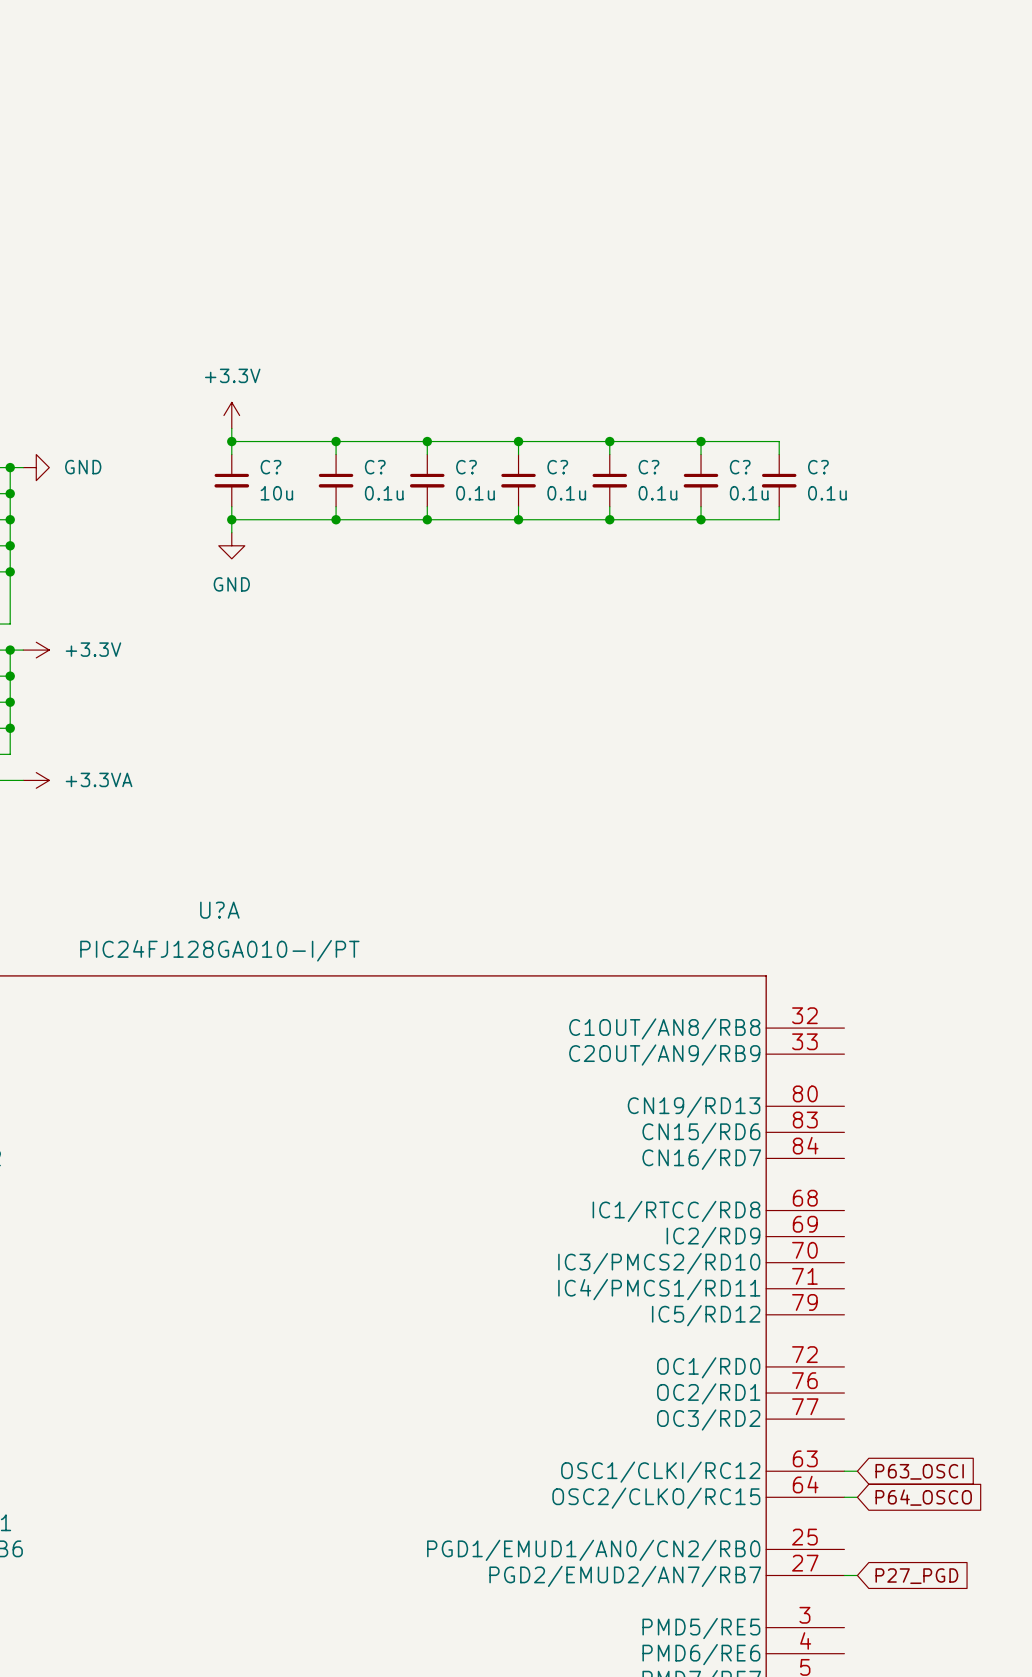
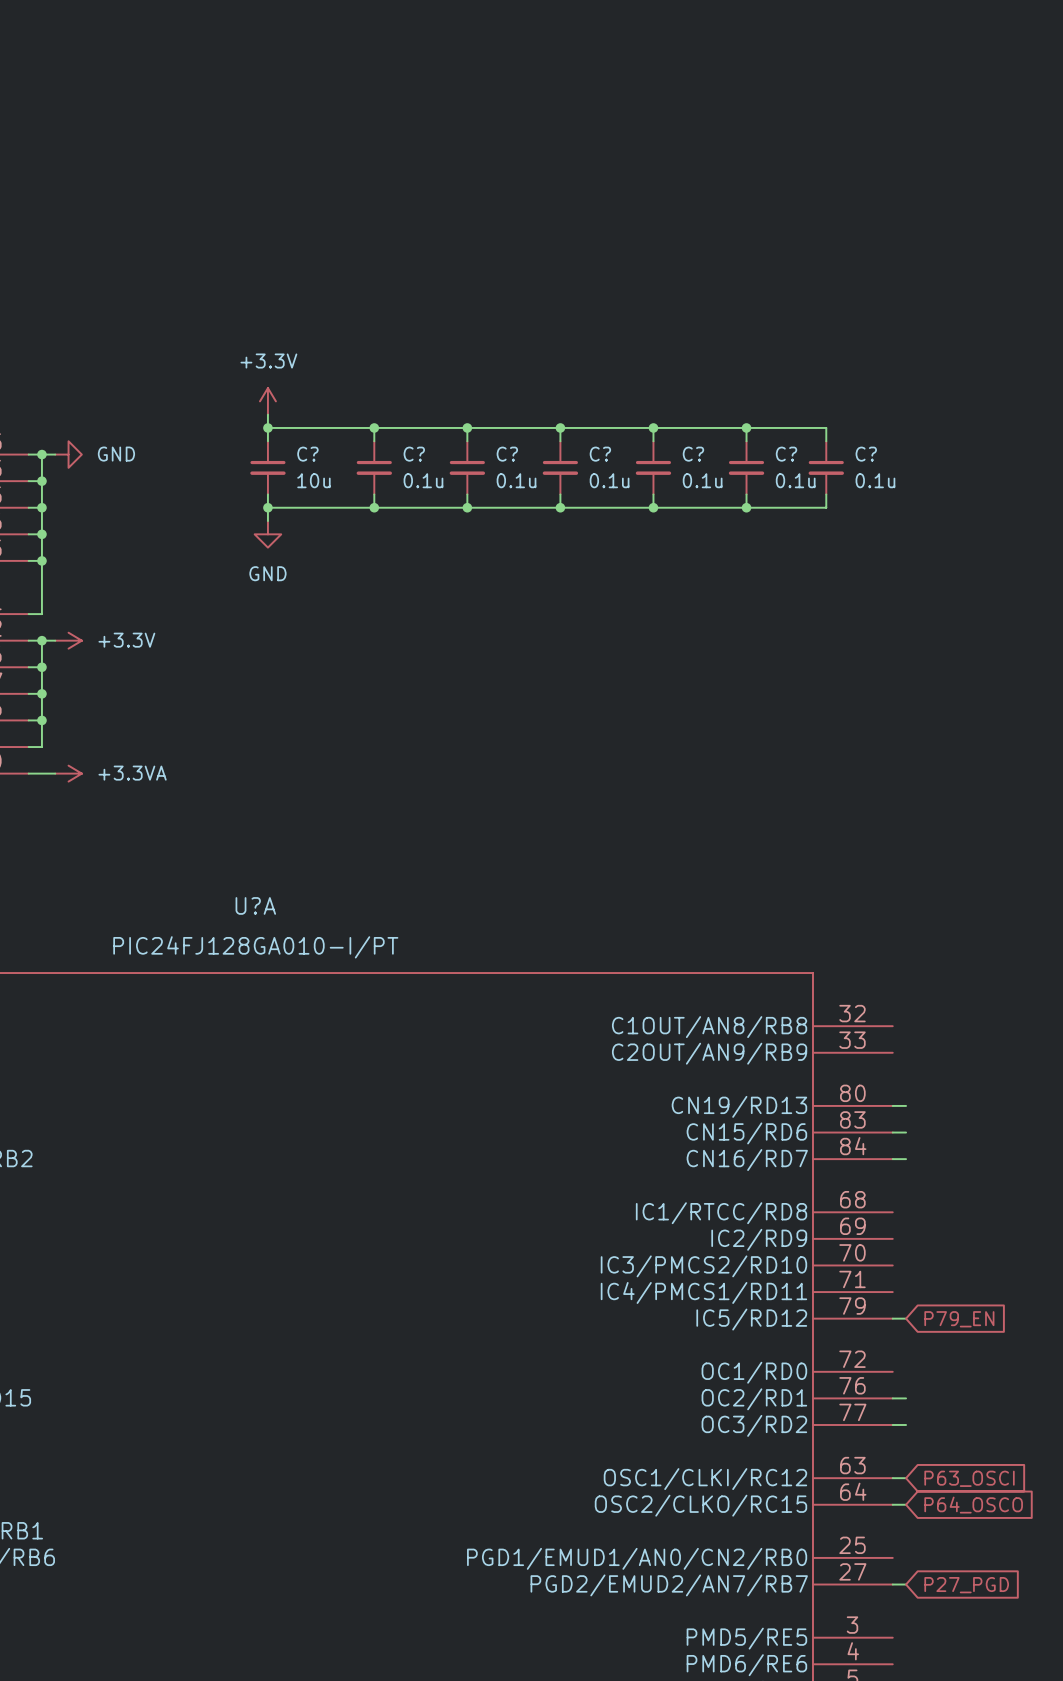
wire: none -> (892, 1105) (906, 1105)
wire: none -> (892, 1132) (906, 1132)
wire: none -> (892, 1159) (906, 1159)
wire: none -> (892, 1318) (906, 1318)
global label: none -> P79_EN (959, 1319)
wire: none -> (892, 1398) (906, 1398)
wire: none -> (892, 1424) (906, 1424)

